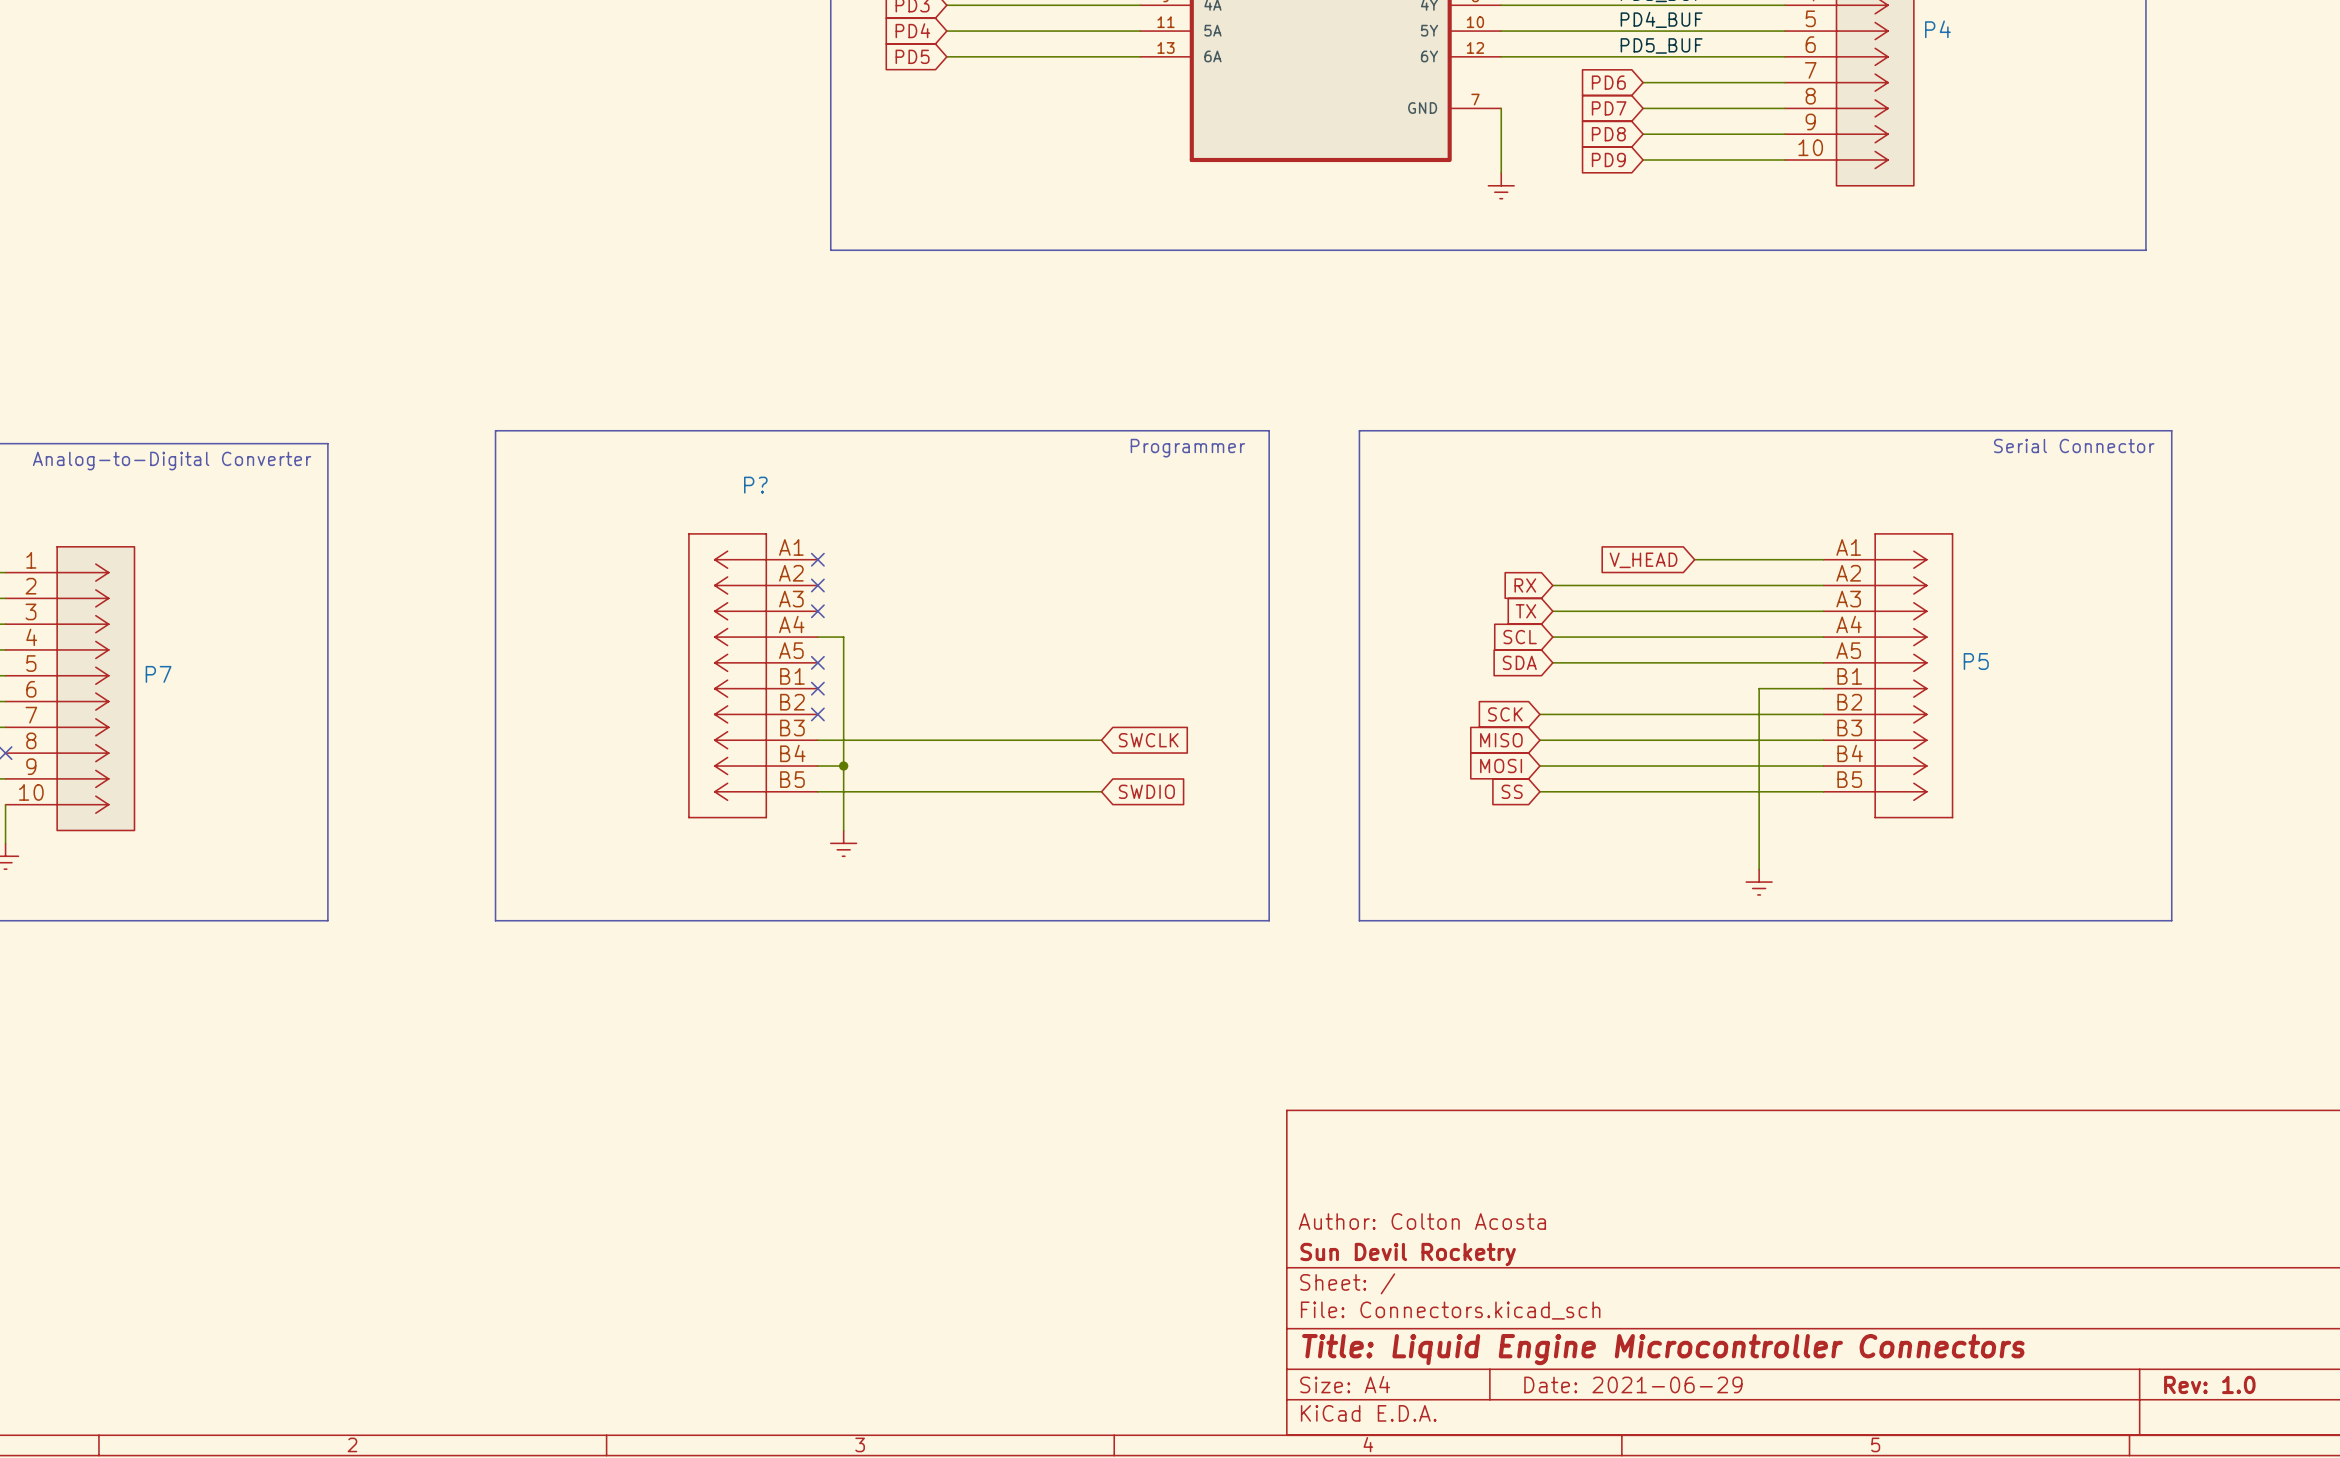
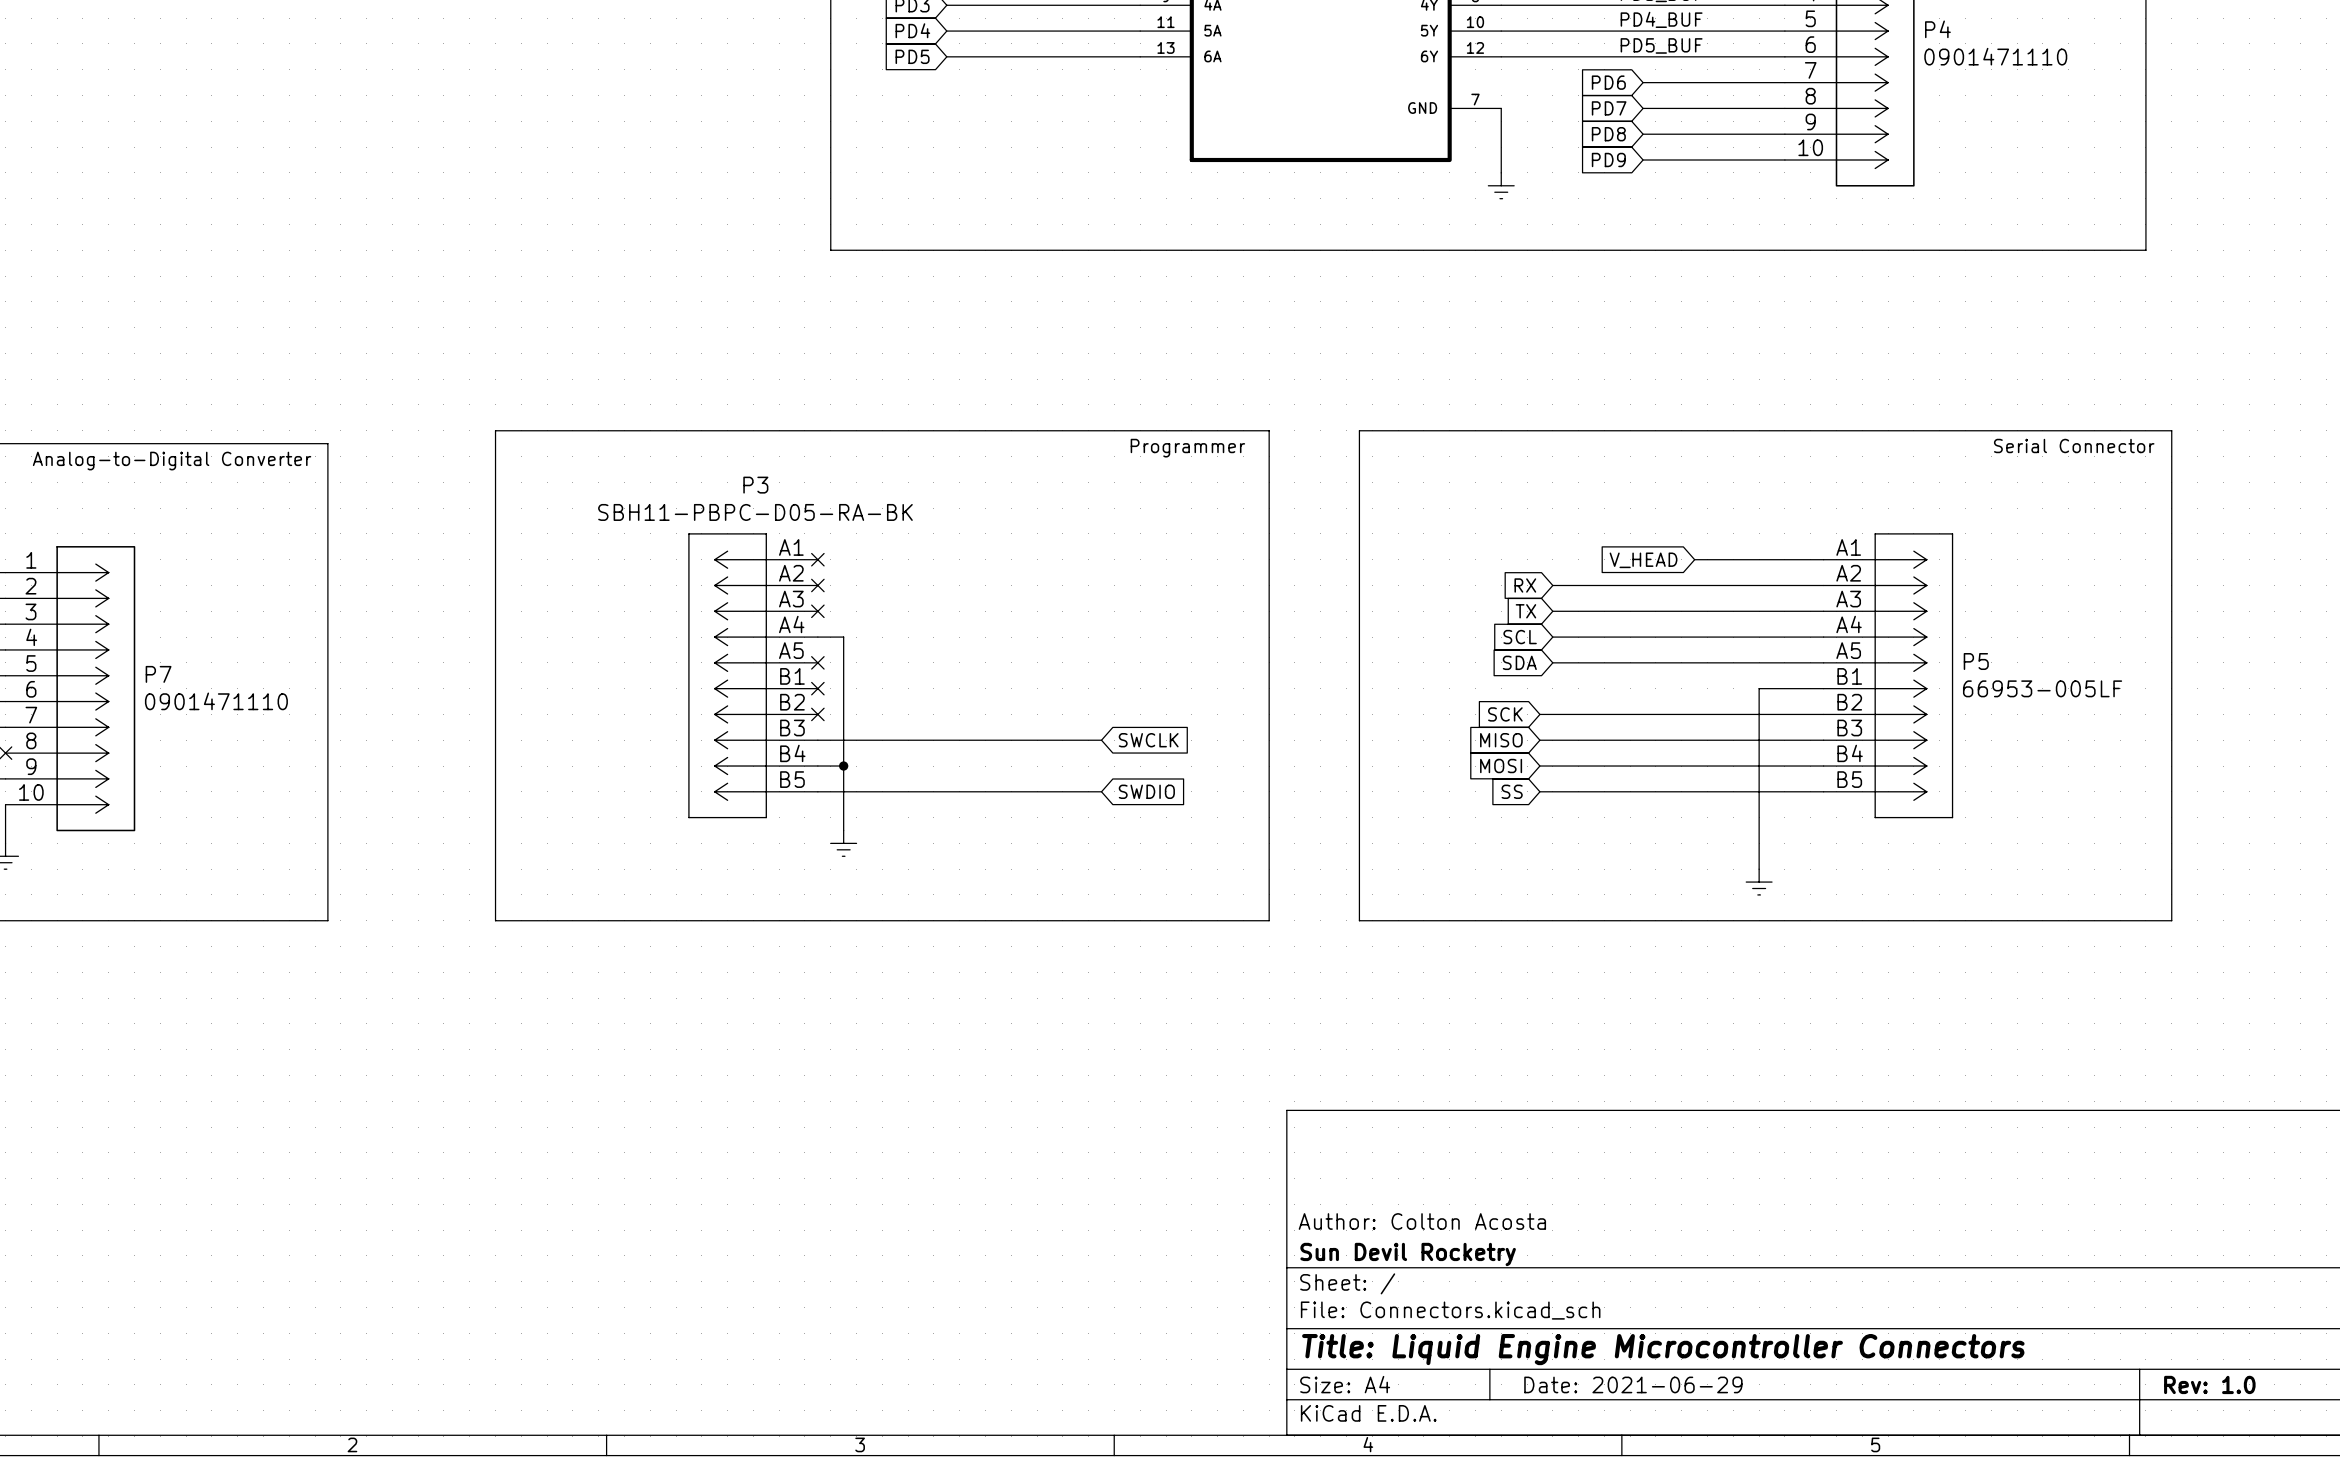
P4 value: none -> 0901471110 (1995, 56)
P? name: P? (755, 485) -> P3 (755, 485)
P? value: none -> SBH11-PBPC-D05-RA-BK (755, 512)
P5 value: none -> 66953-005LF (2042, 688)
P7 value: none -> 0901471110 (216, 701)

